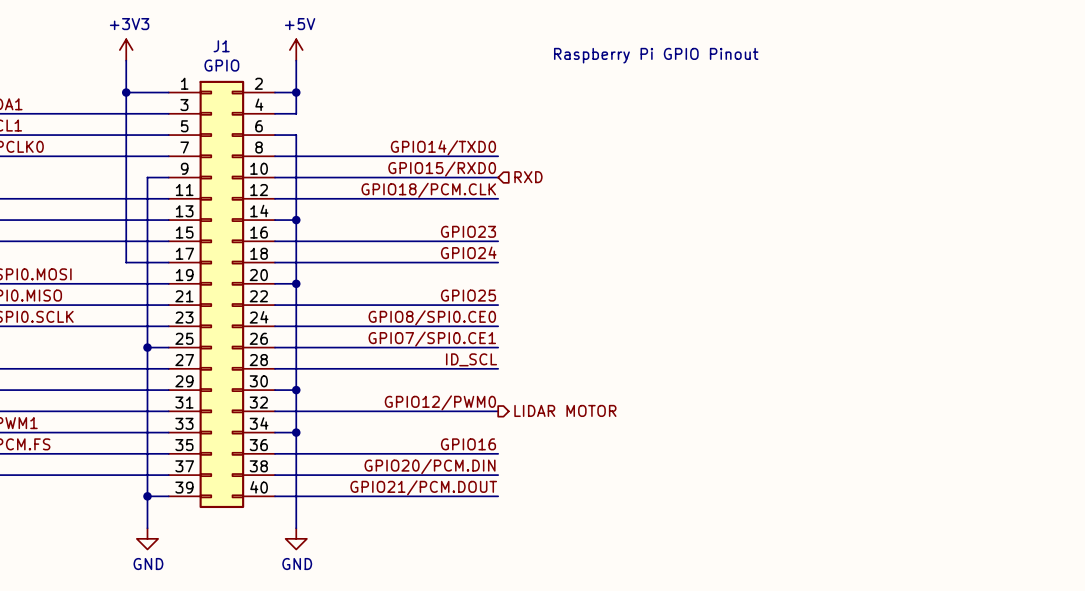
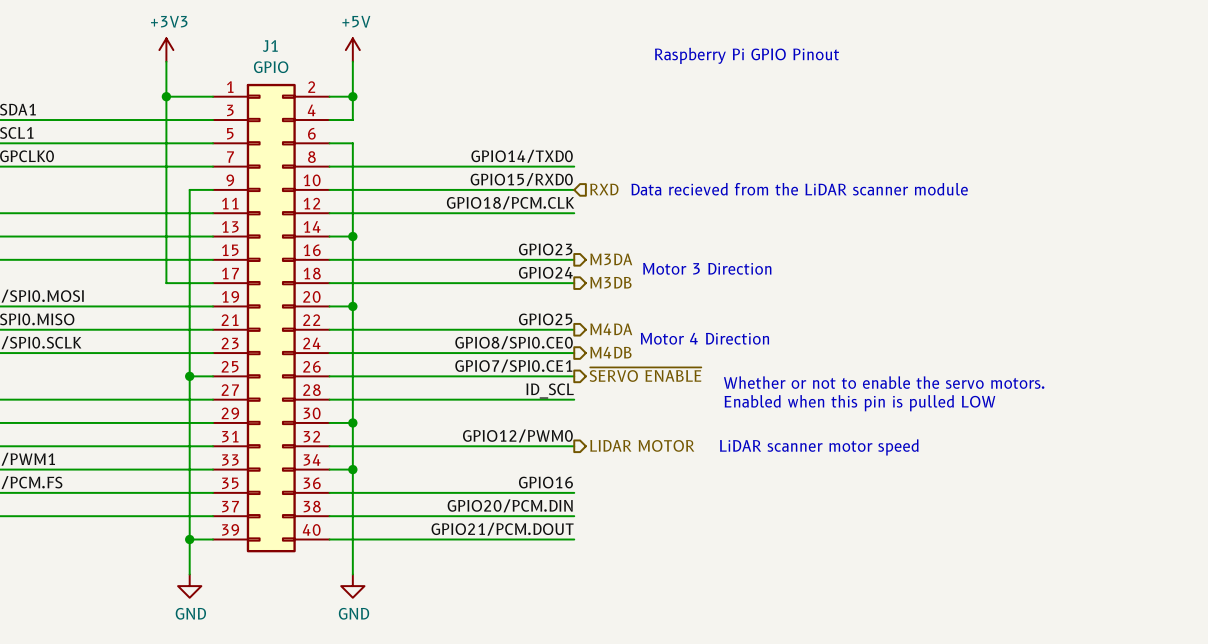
text: none -> Data recieved from the LiDAR scanner module (799, 189)
hierarchical label: none -> M3DA (611, 259)
text: none -> Motor 3 Direction (707, 268)
hierarchical label: none -> M3DB (610, 282)
hierarchical label: none -> M4DA (611, 329)
text: none -> Motor 4 Direction (704, 338)
hierarchical label: none -> M4DB (610, 352)
hierarchical label: none -> ~{SERVO ENABLE} (645, 374)
text: none -> Whether or not to enable the servo motors. (884, 382)
text: none -> Enabled when this pin is pulled LOW (859, 403)
text: none -> LiDAR scanner motor speed (819, 447)

